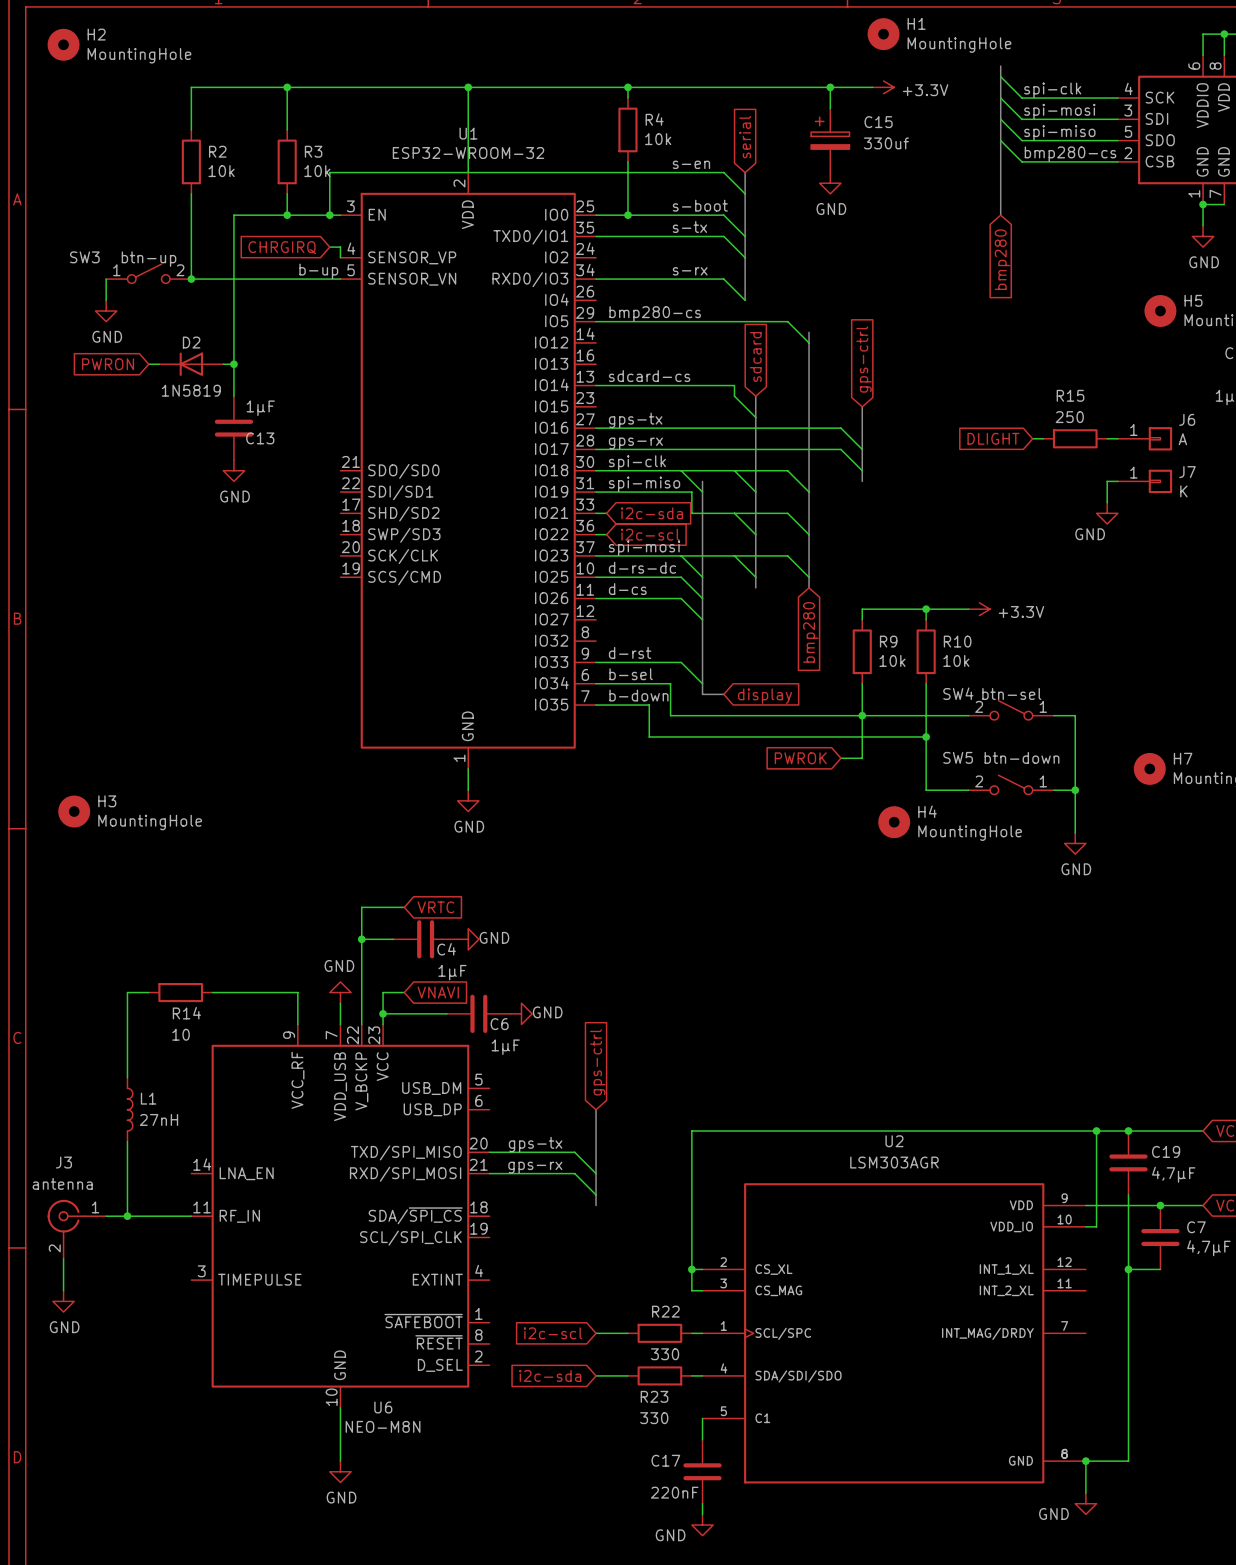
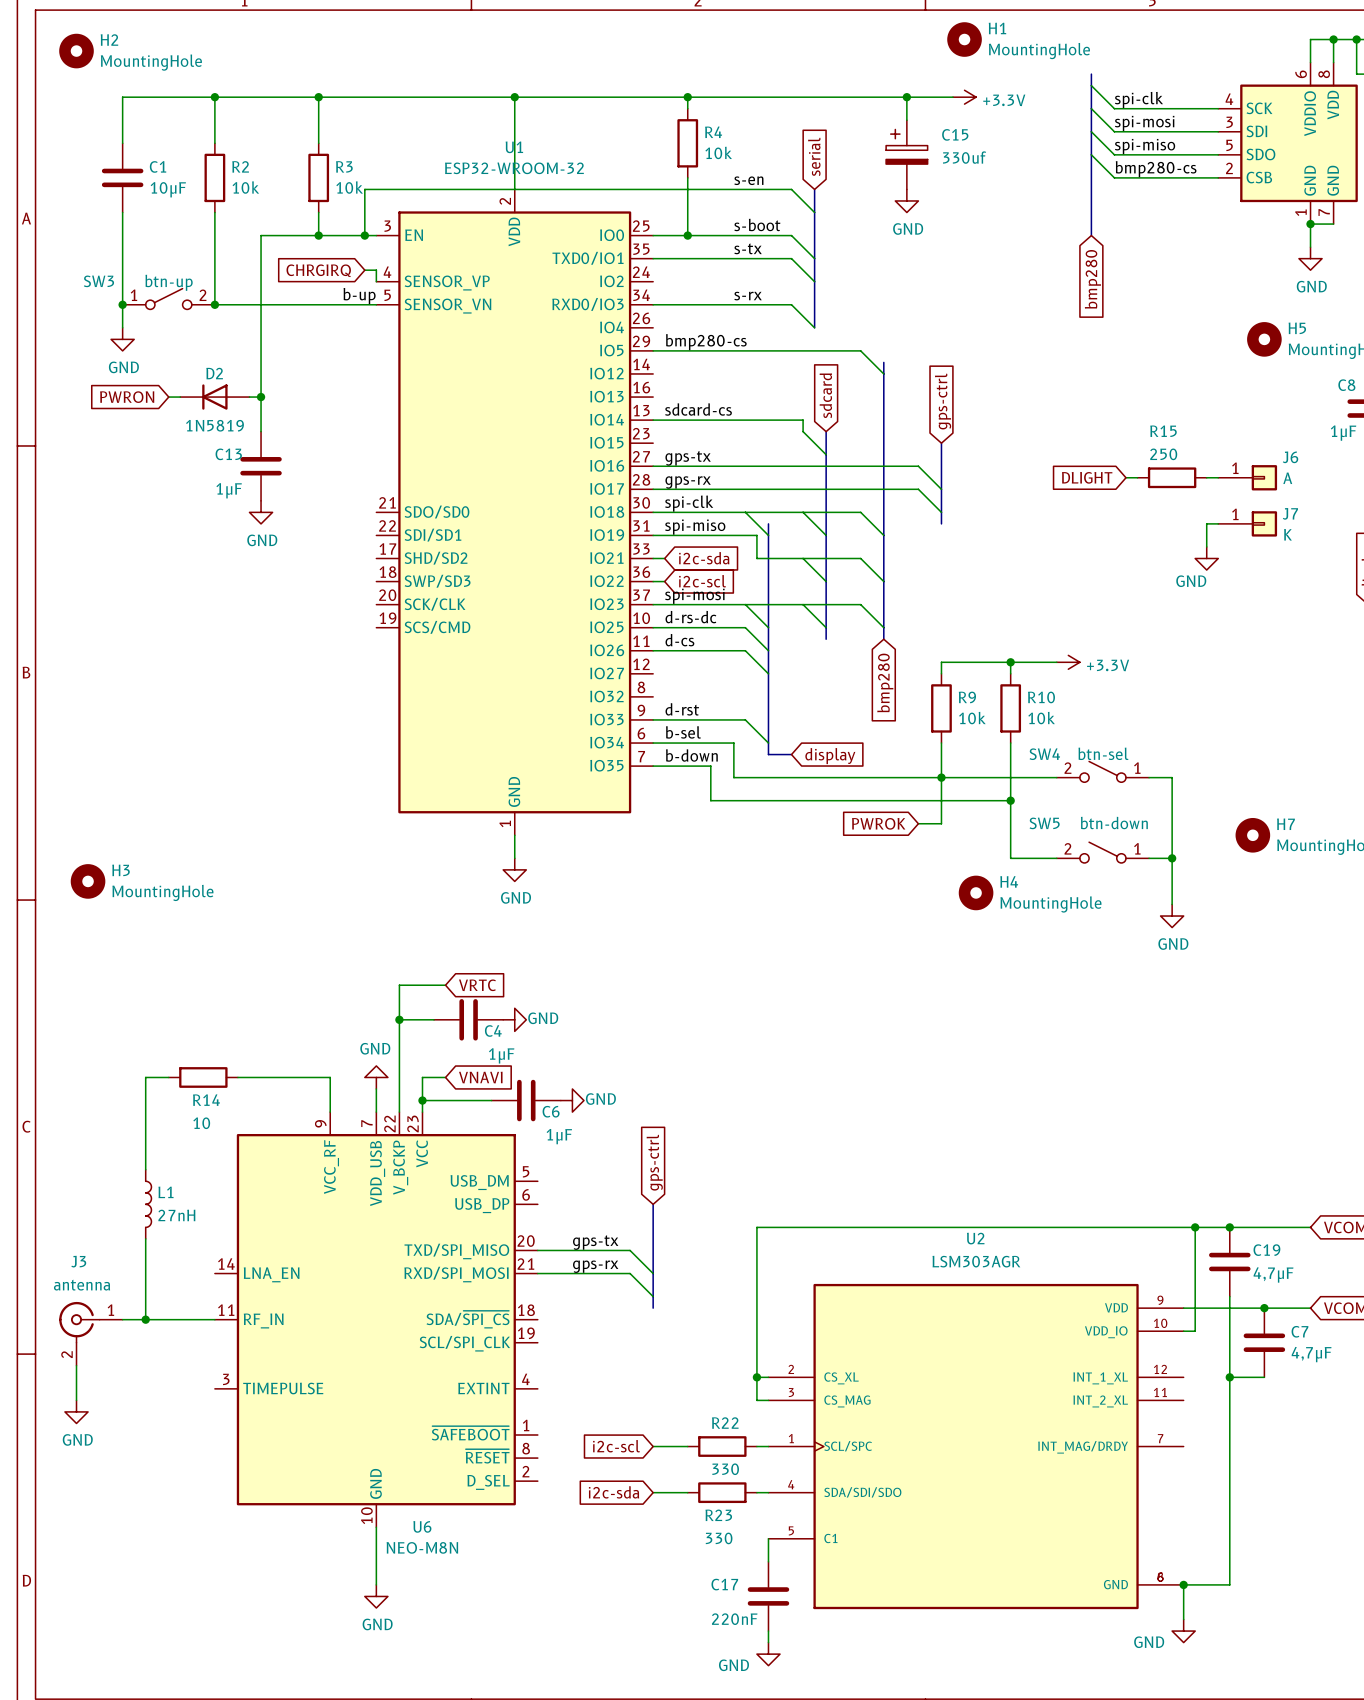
wire: none -> (214, 97) (122, 97) (122, 143)
junction: none -> (214, 97)
C1: none -> 10μF (122, 177)
wire: none -> (122, 212) (122, 304)
junction: none -> (122, 304)
C13 value position: 1μF (260, 408) -> 1μF (229, 490)
C13 name position: C13 (260, 438) -> C13 (228, 454)

